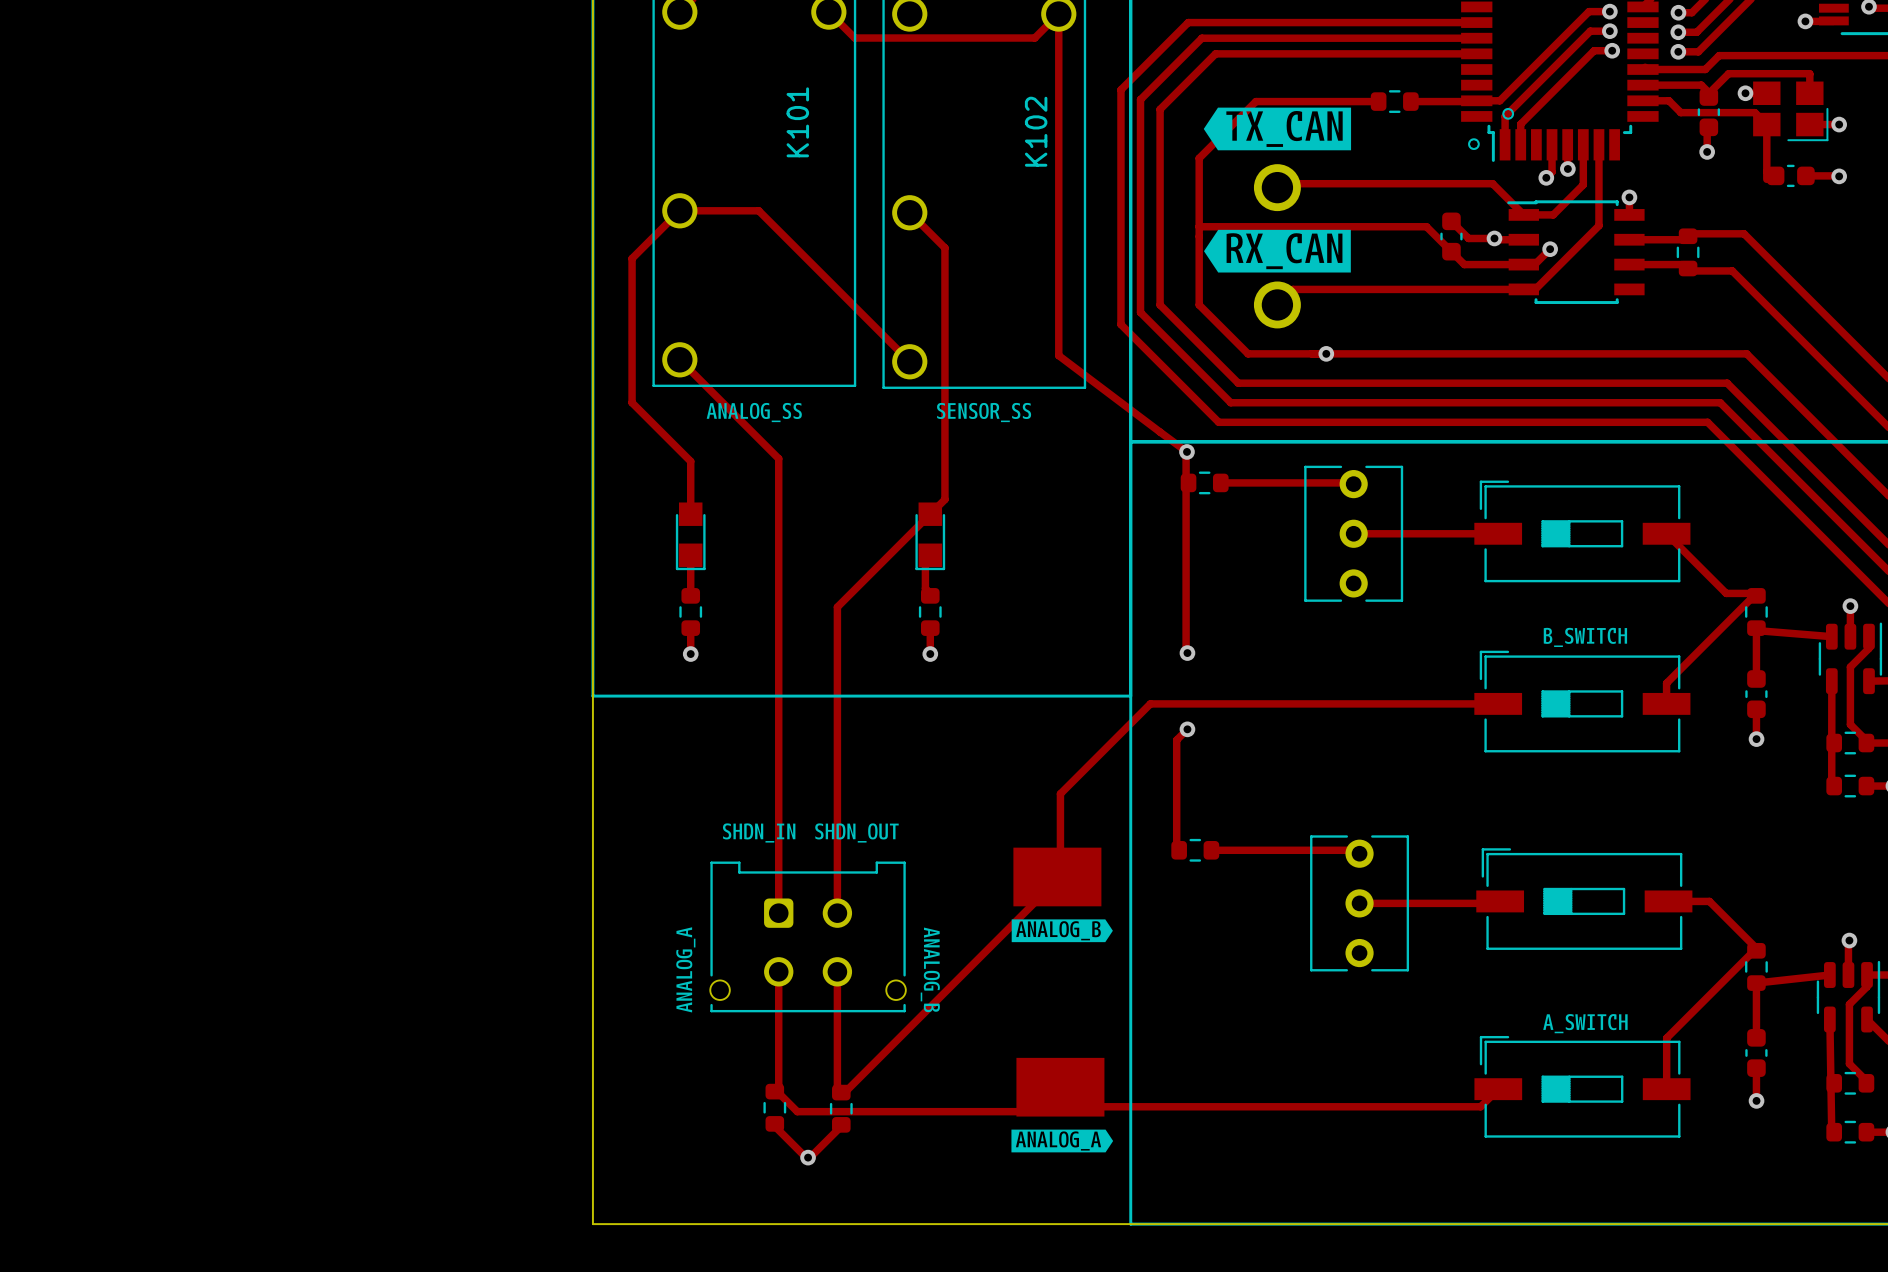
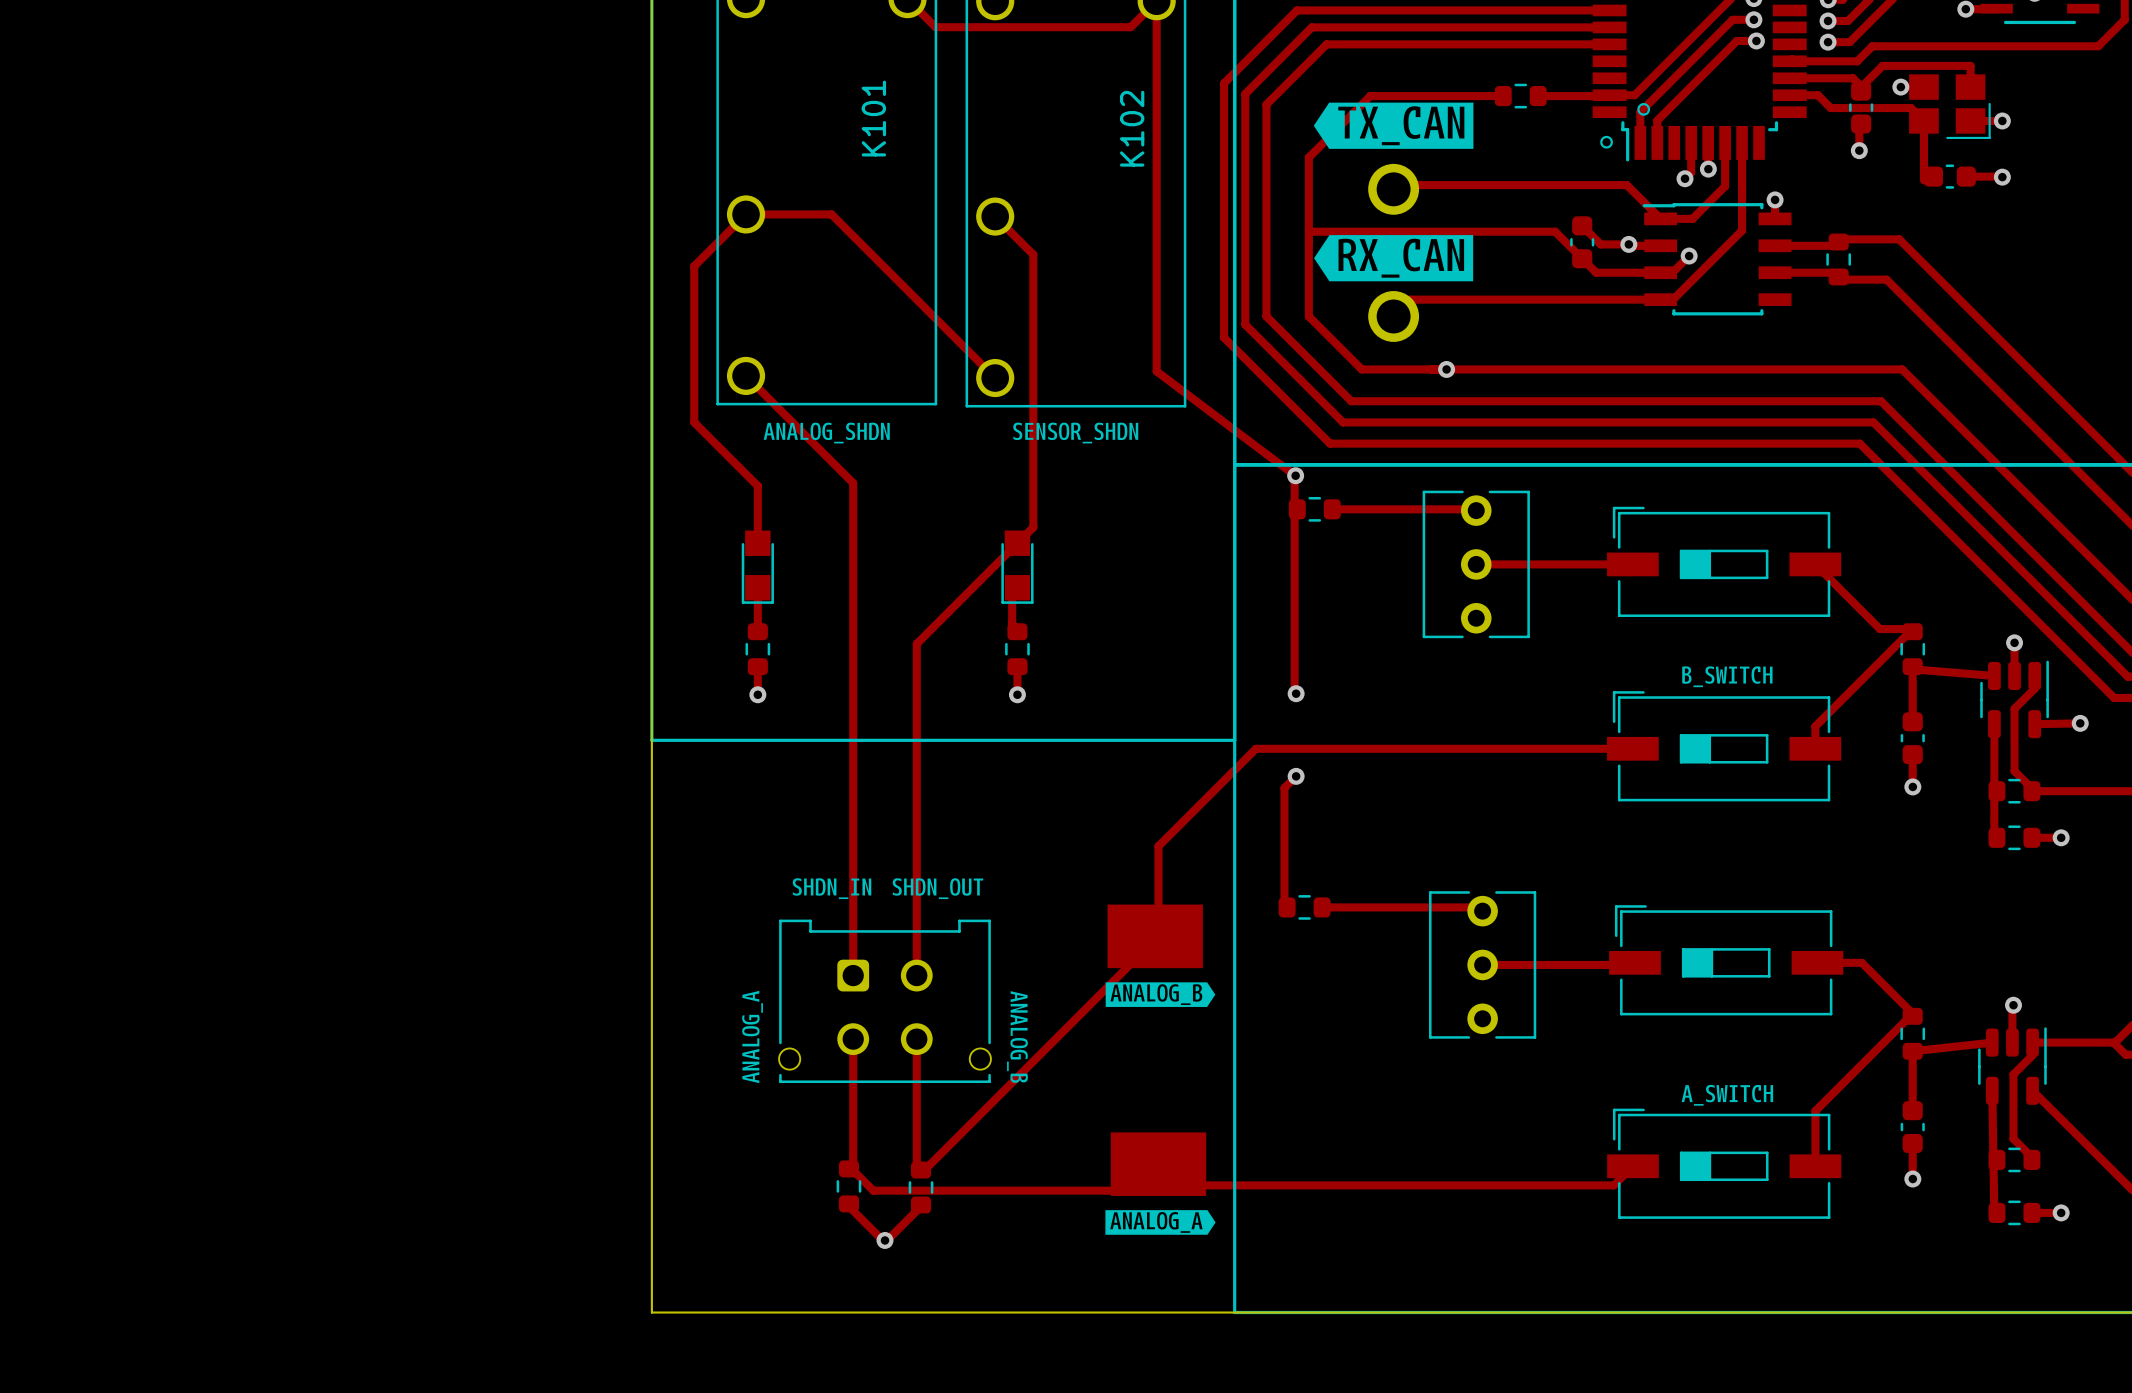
drawing shape: [706, 402, 802, 423] -> [763, 422, 890, 444]
drawing shape: [937, 402, 1032, 423] -> [1013, 422, 1139, 444]

